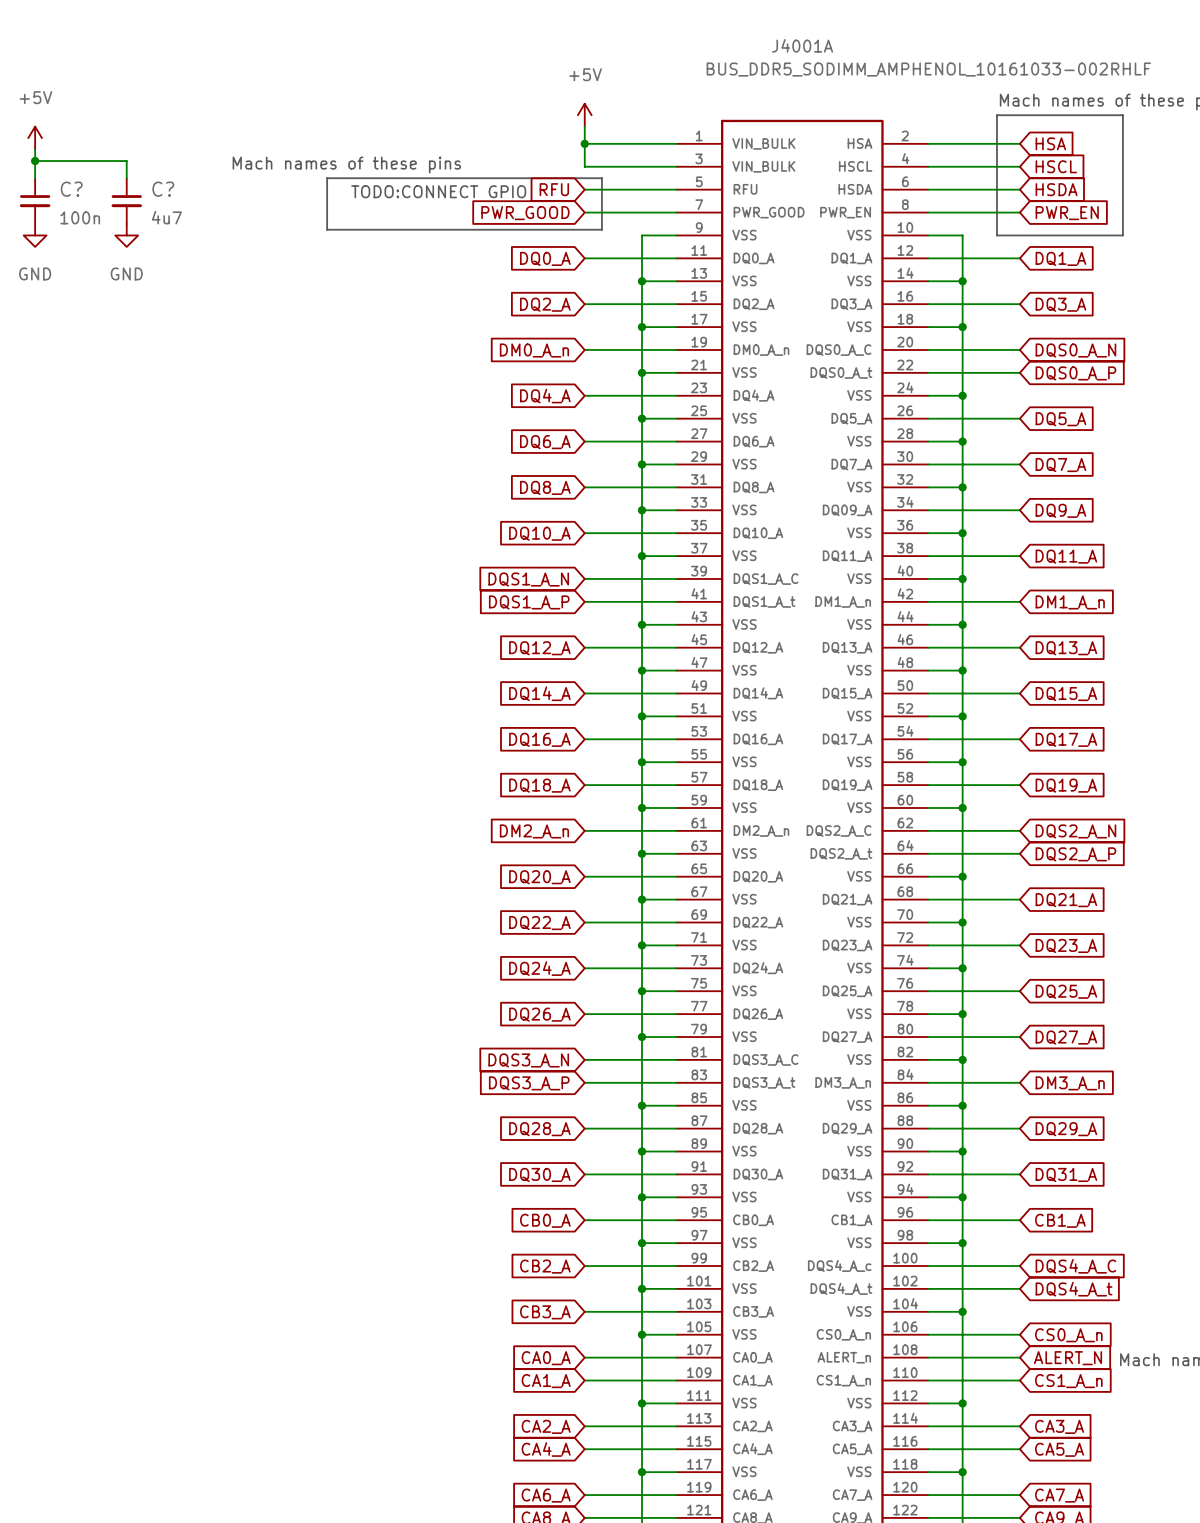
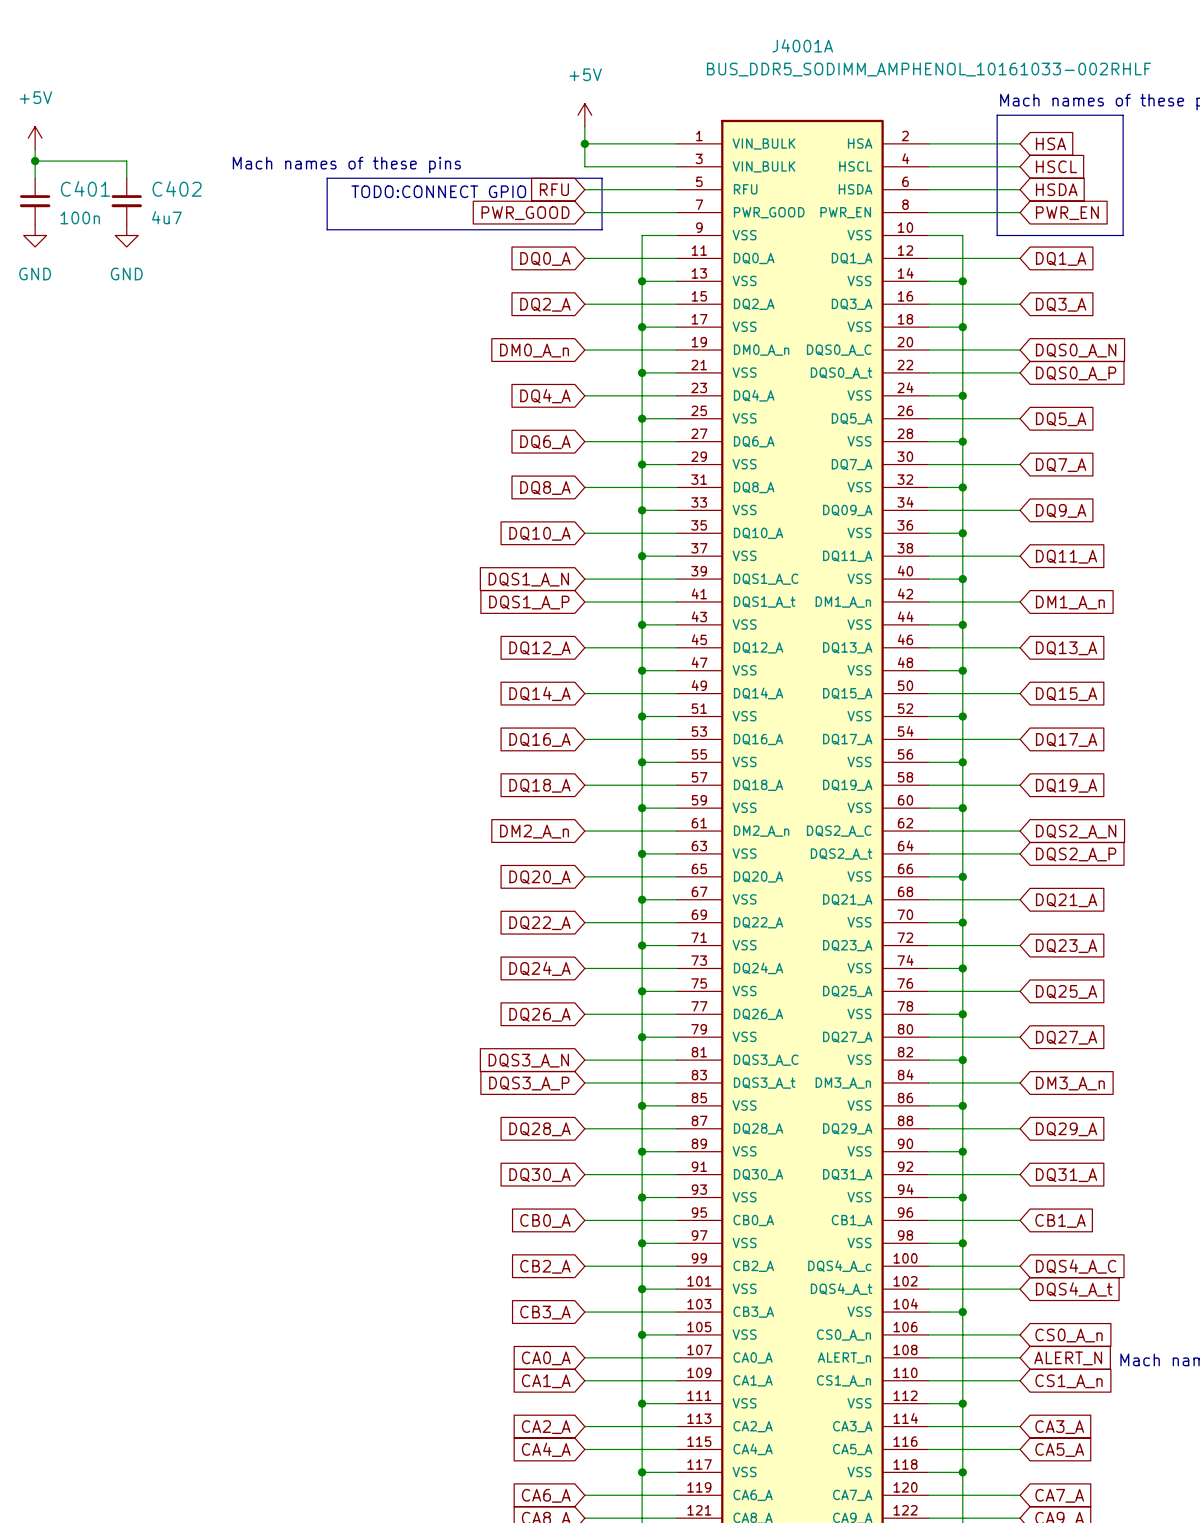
C? name: C? (71, 189) -> C401 (85, 188)
C? name: C? (163, 189) -> C402 (177, 188)

